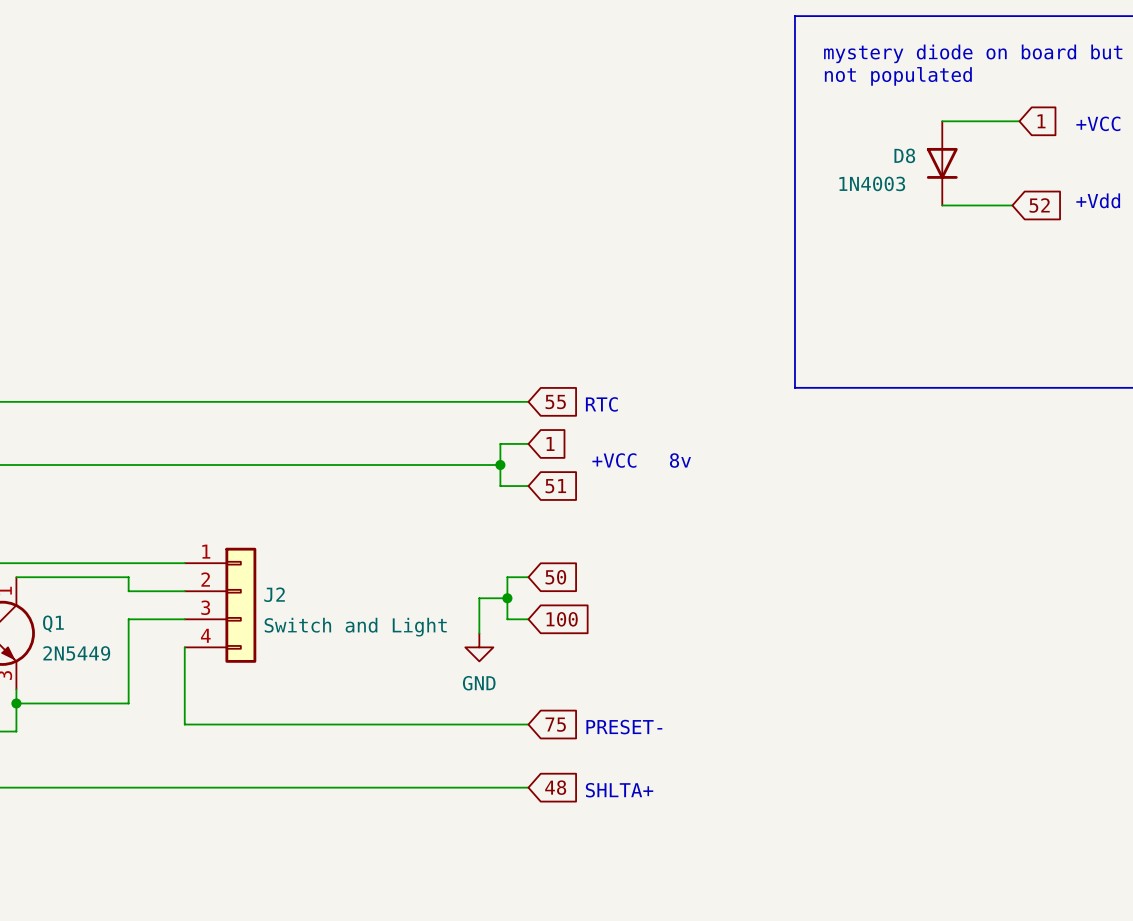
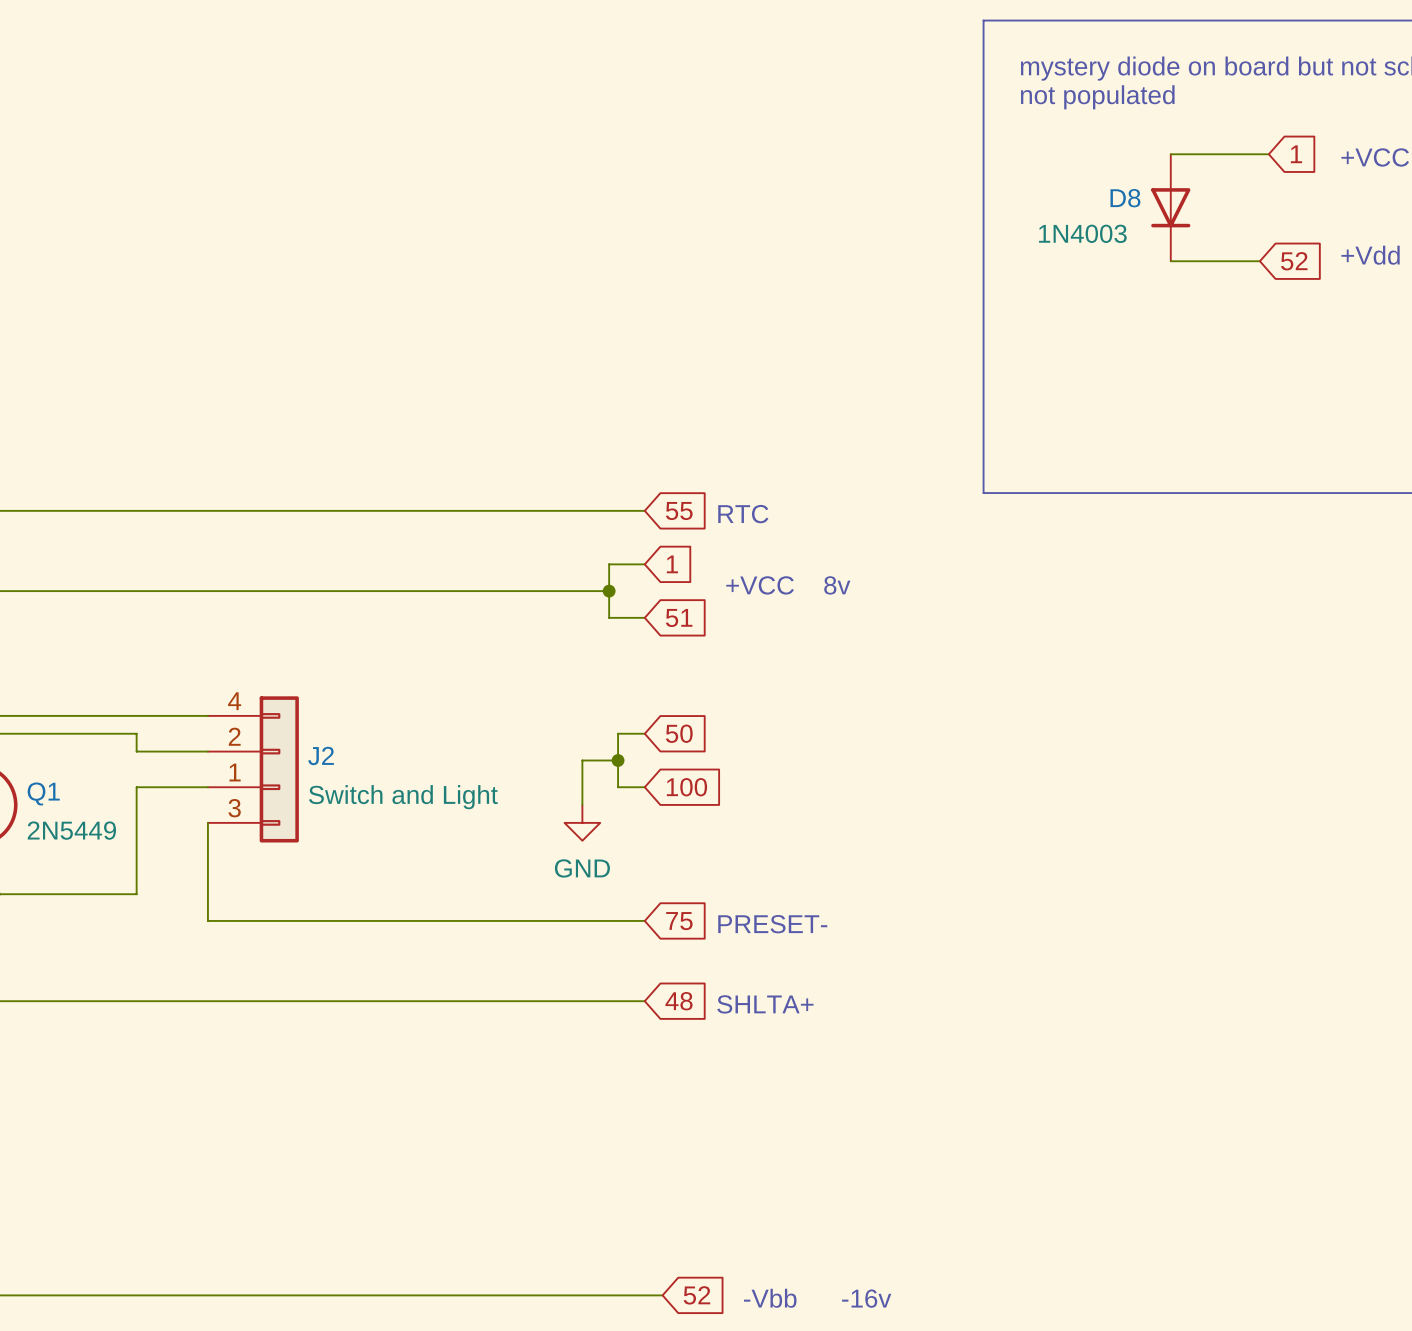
J2 pin number: 1 (206, 551) -> 4 (234, 701)
J2 pin number: 3 (205, 607) -> 1 (235, 772)
J2 pin number: 4 (205, 635) -> 3 (234, 808)

